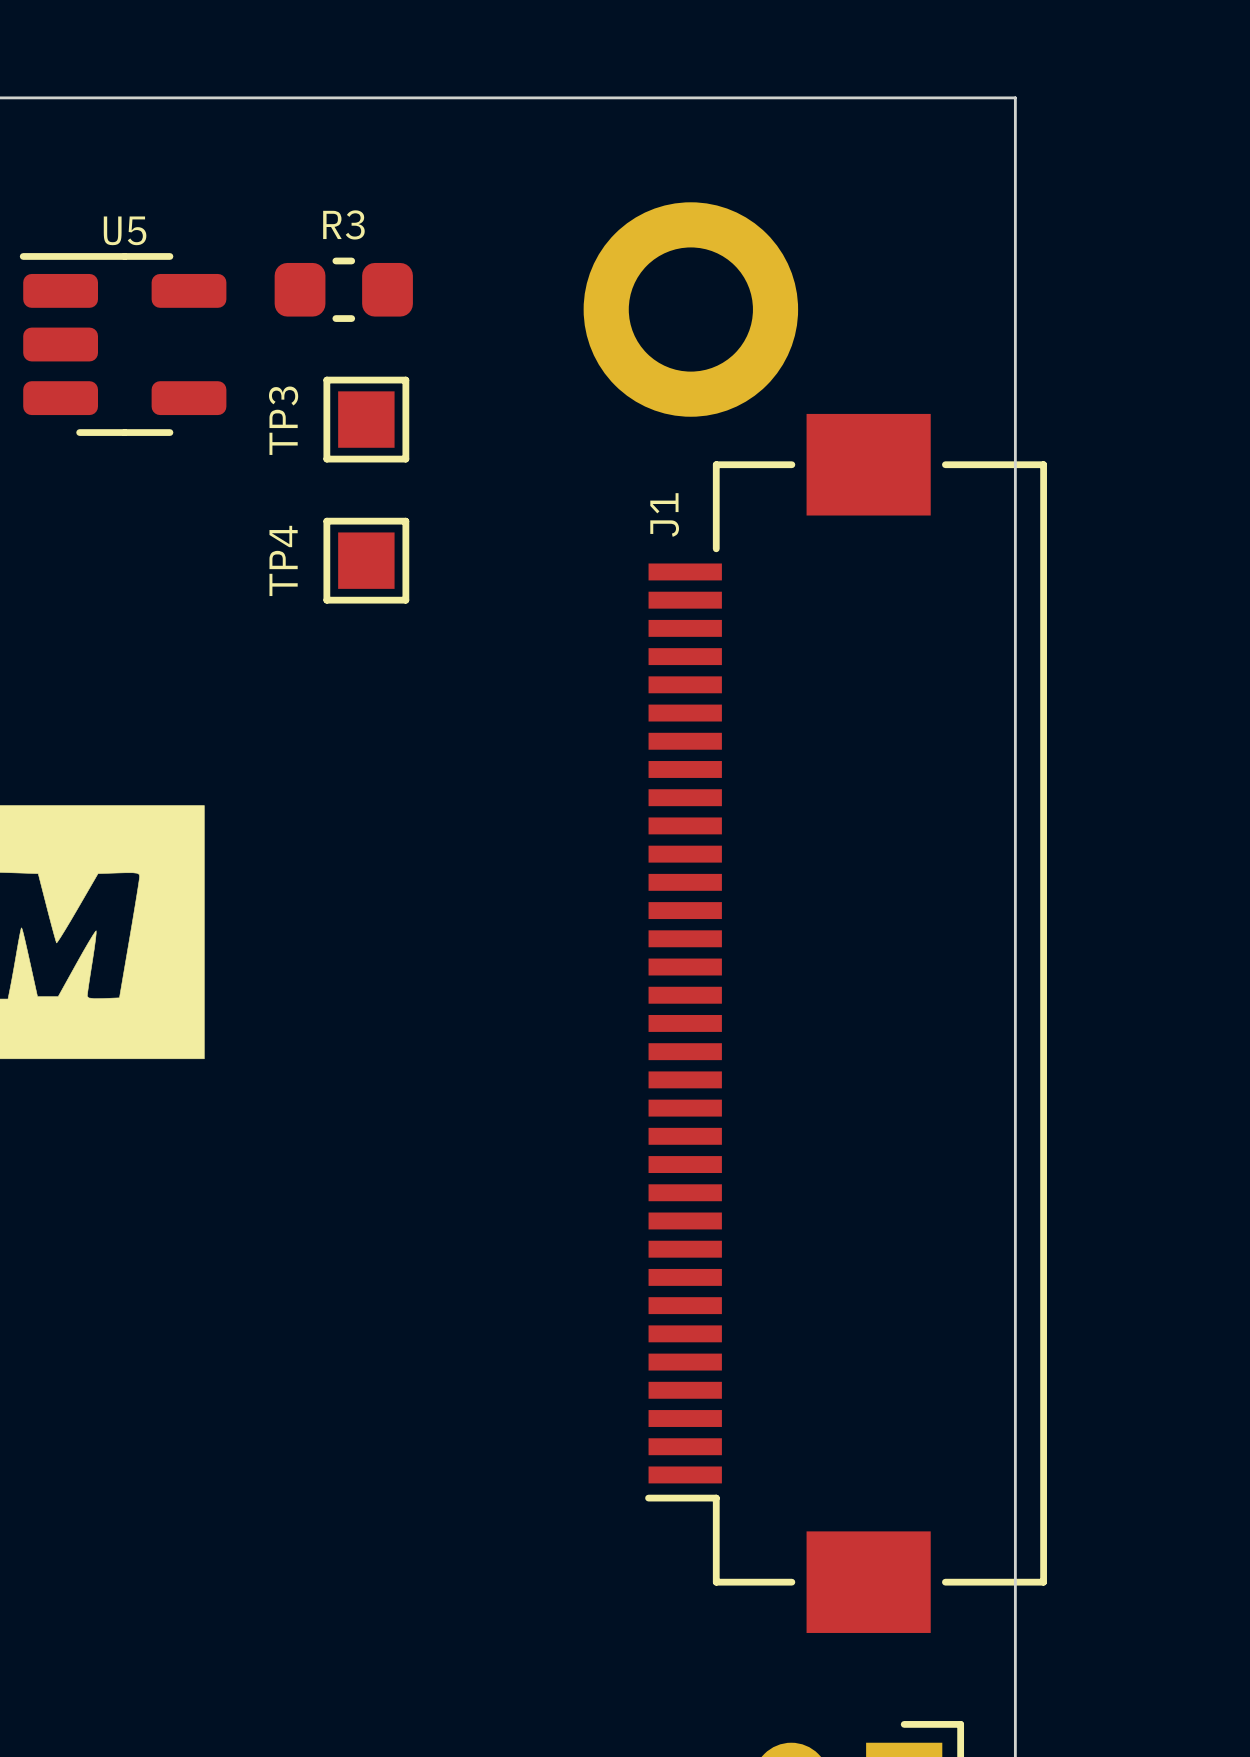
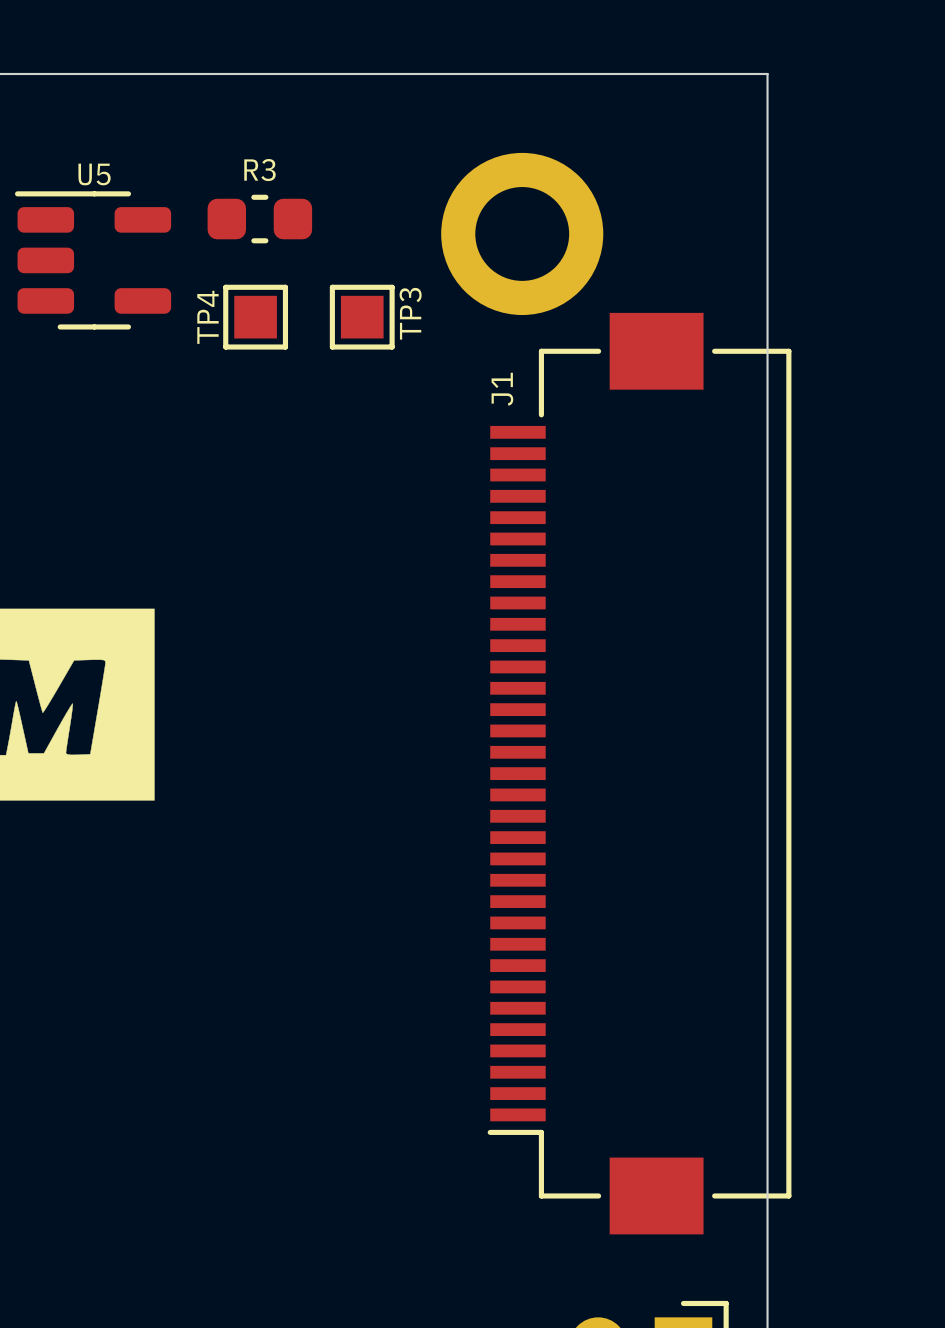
TP3 position: (366, 419) -> (362, 317)
TP3 name position: TP3 (283, 420) -> TP3 (410, 313)
TP4 name position: TP4 (283, 560) -> TP4 (207, 317)
TP4 position: (366, 560) -> (255, 317)

